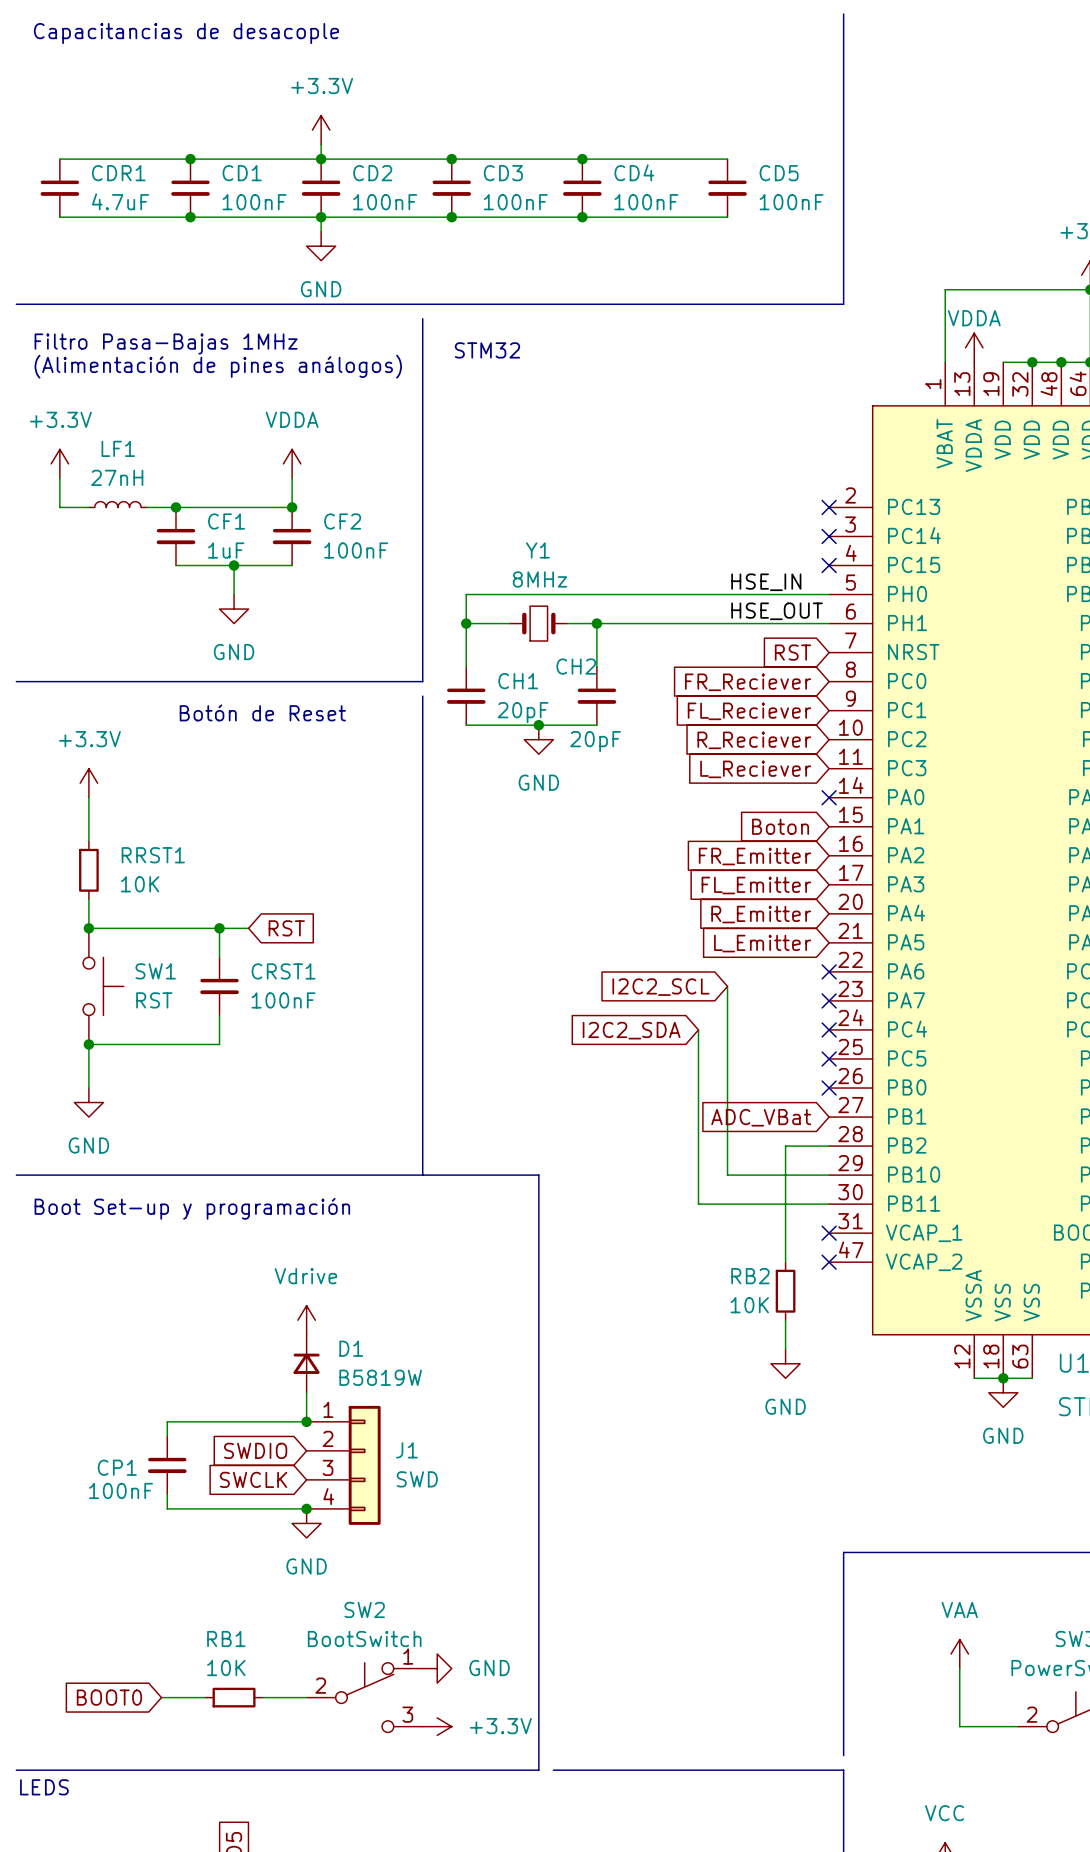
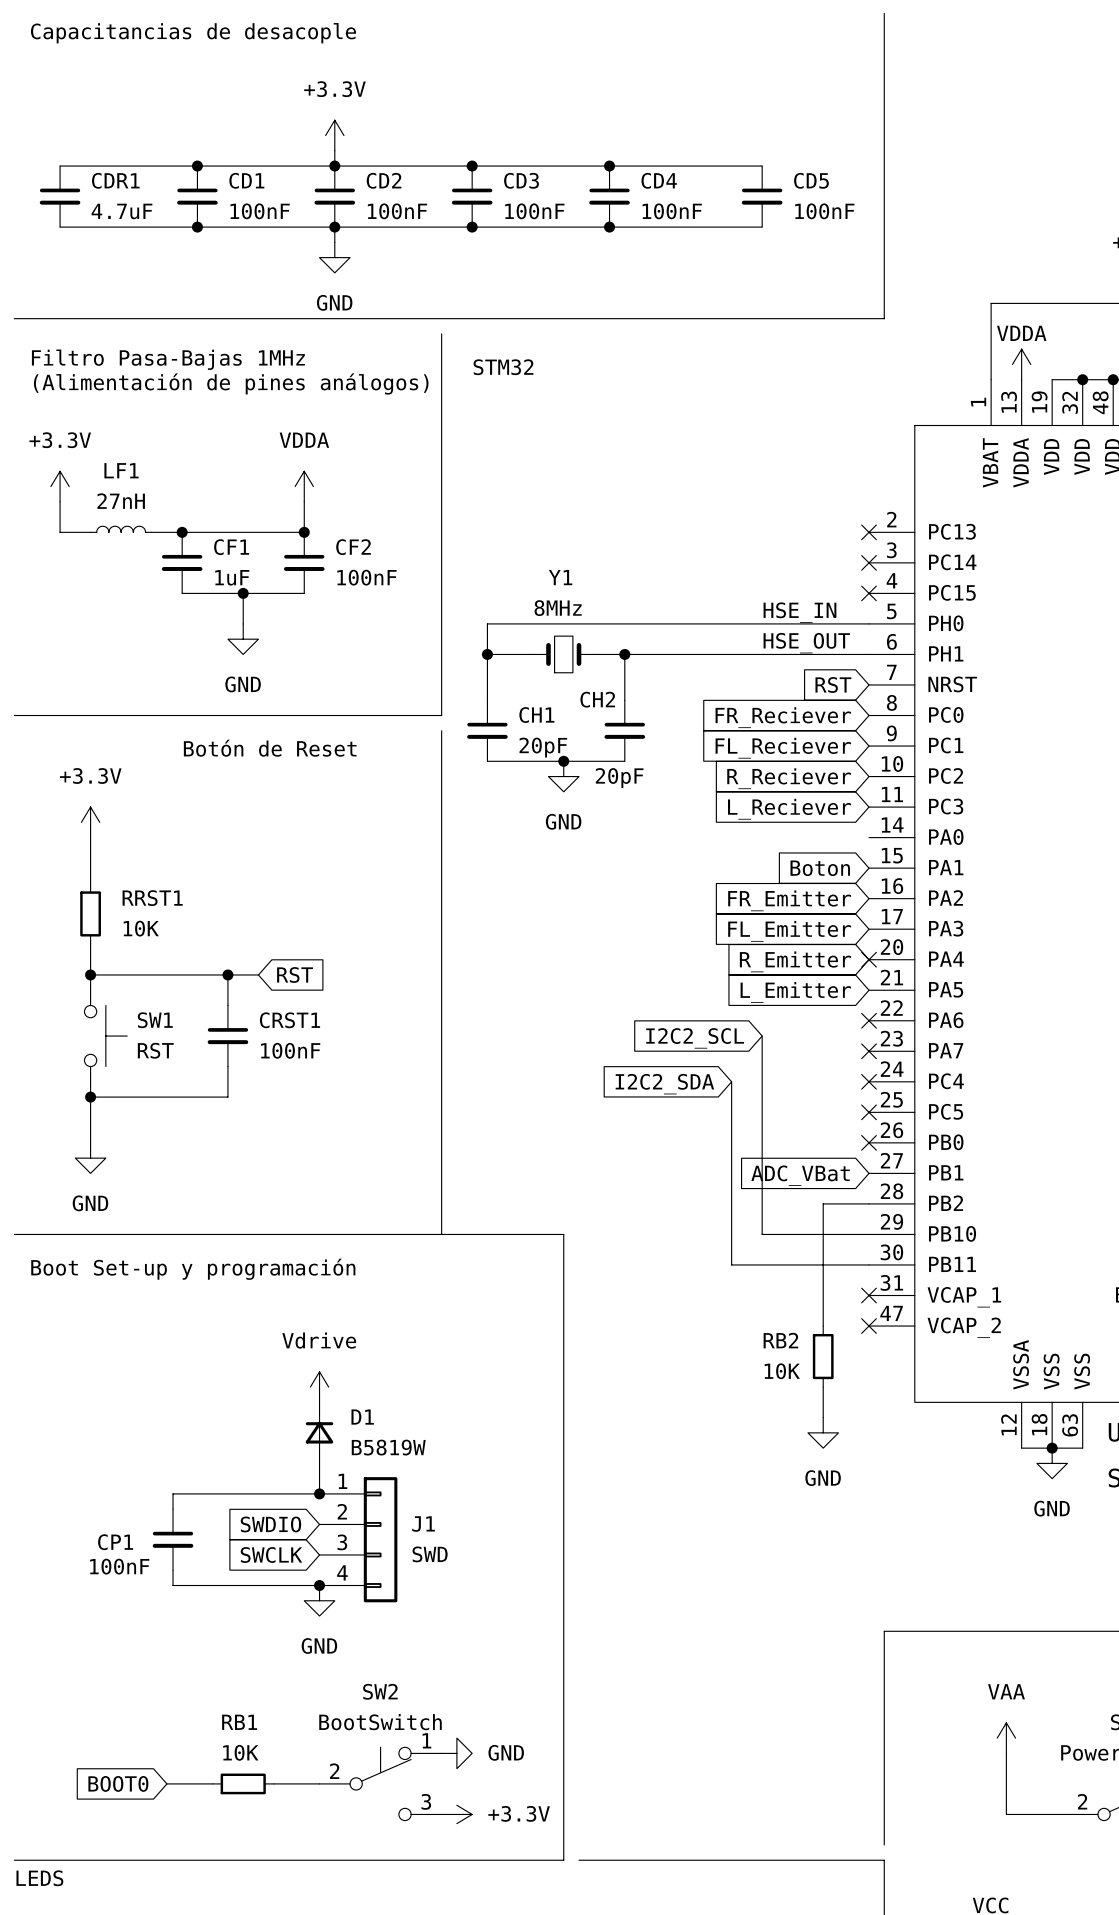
no-connect mark: (829, 797) -> none
no-connect mark: none -> (869, 959)

